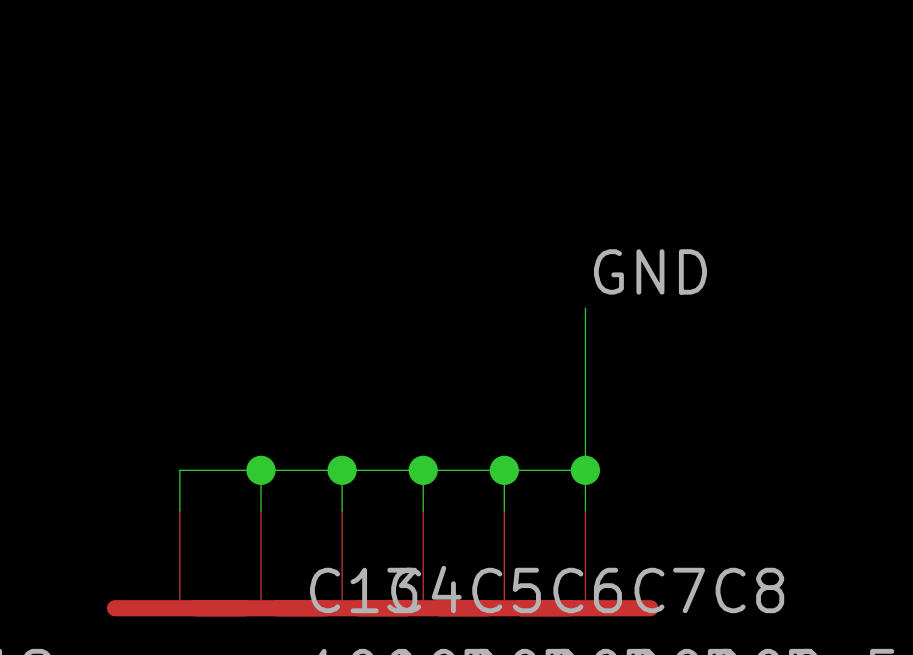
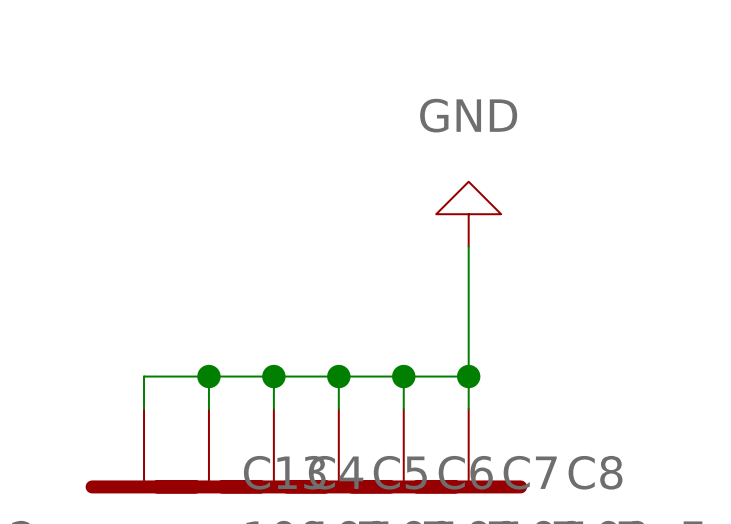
power symbol: none -> GND (468, 214)
label: GND (650, 271) -> none

